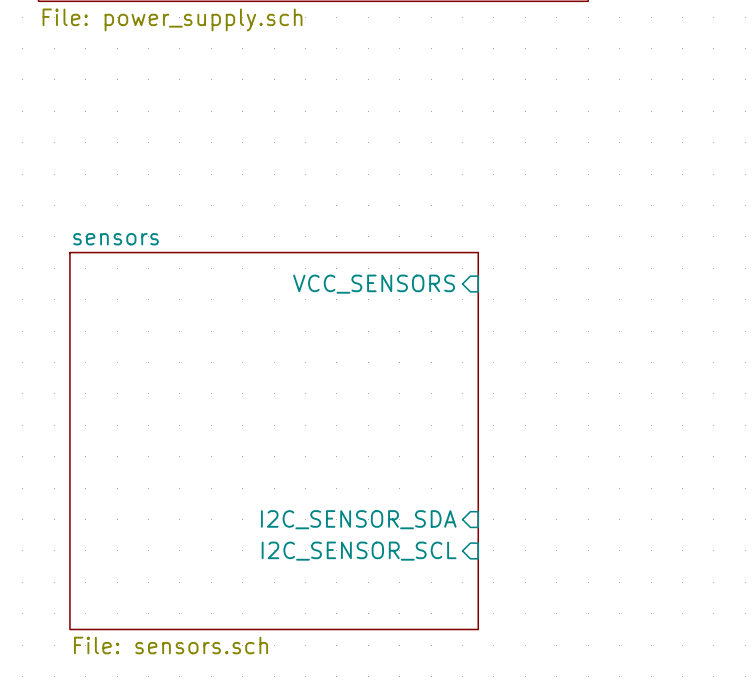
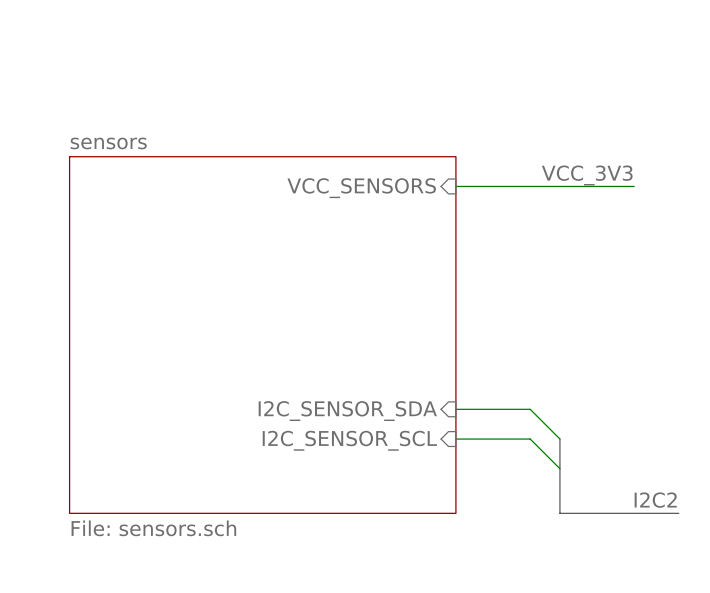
label: none -> VCC_3V3 (587, 175)
wire: none -> (455, 186) (634, 186)
wire: none -> (455, 409) (530, 409) (559, 439)
wire: none -> (455, 439) (530, 439) (559, 468)
bus: none -> (559, 439) (559, 513) (678, 513)
label: none -> I2C2 (655, 500)

